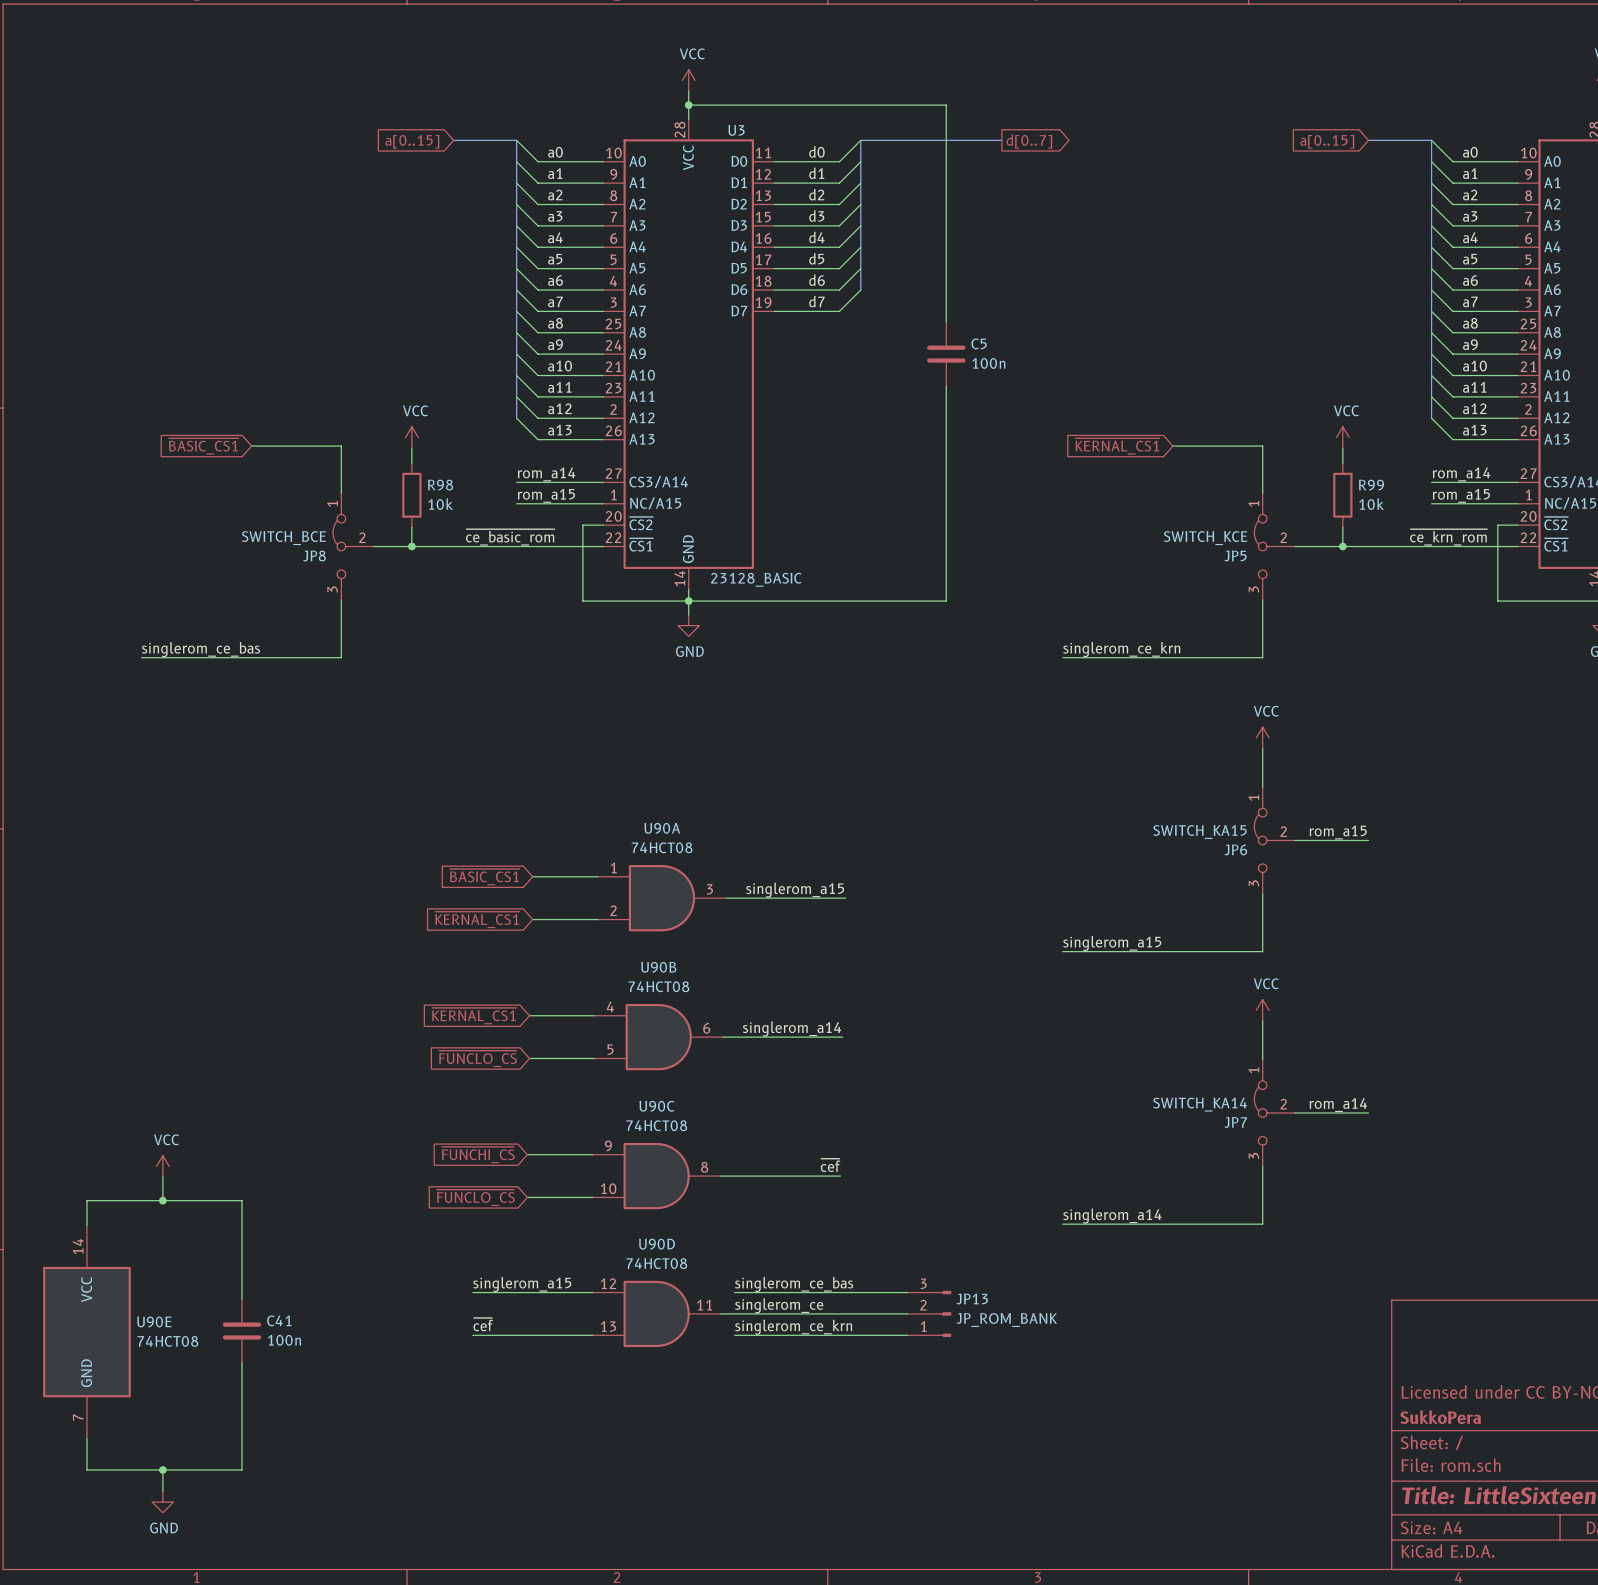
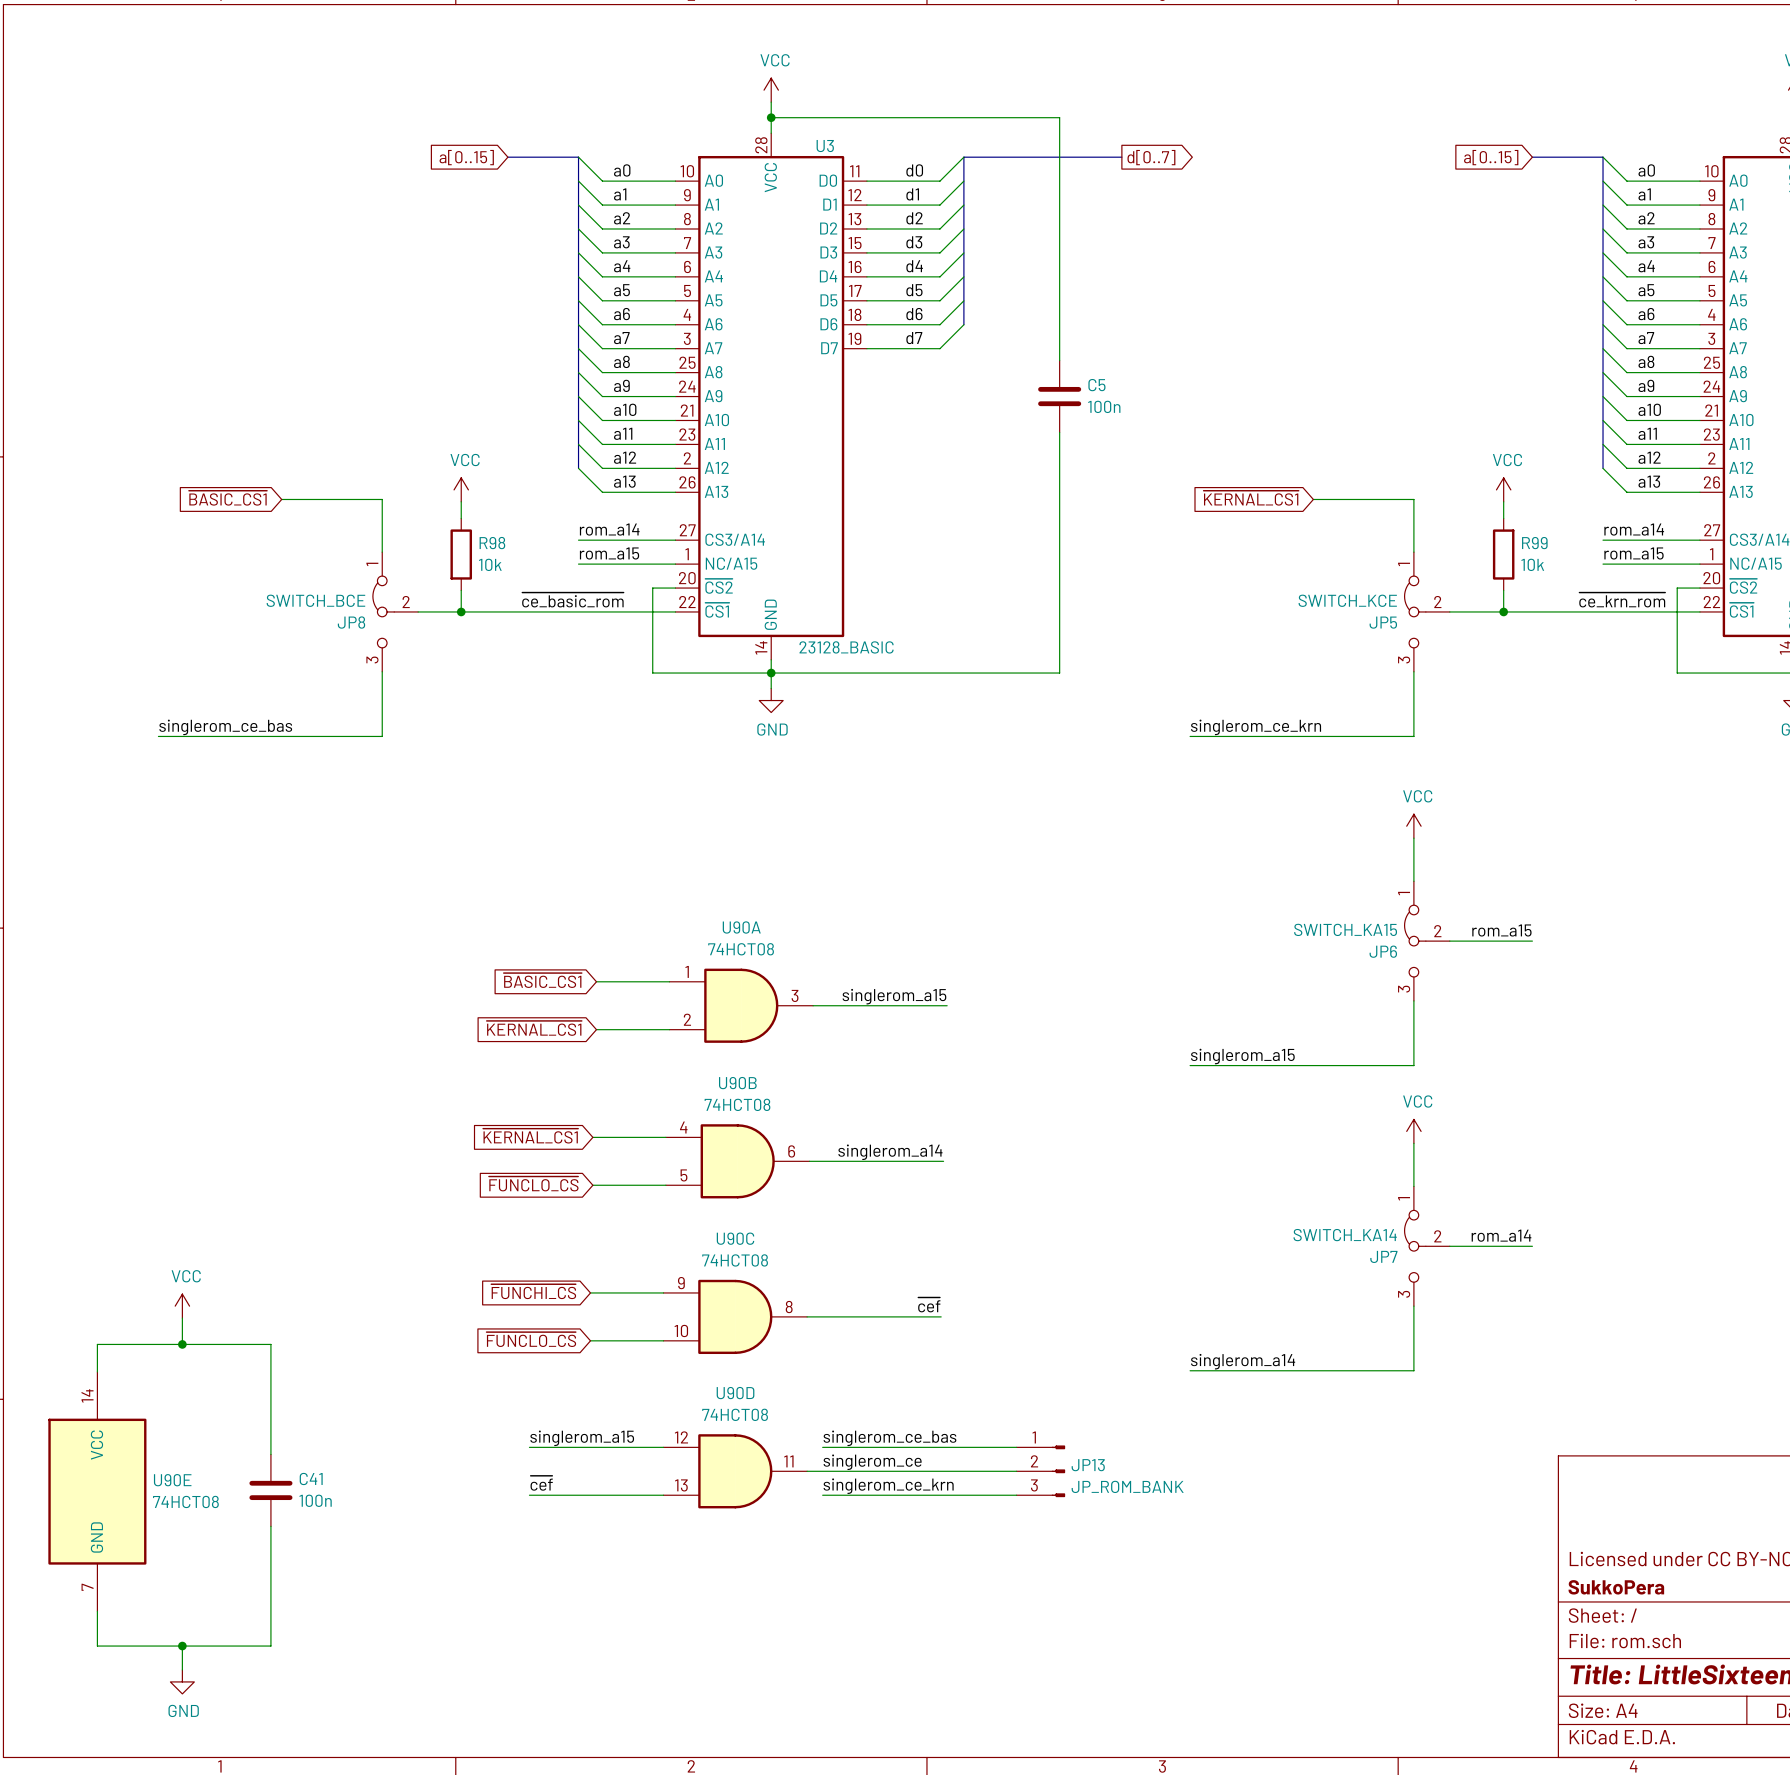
JP13 flip: as is (945, 1313) -> up-down (1058, 1471)

